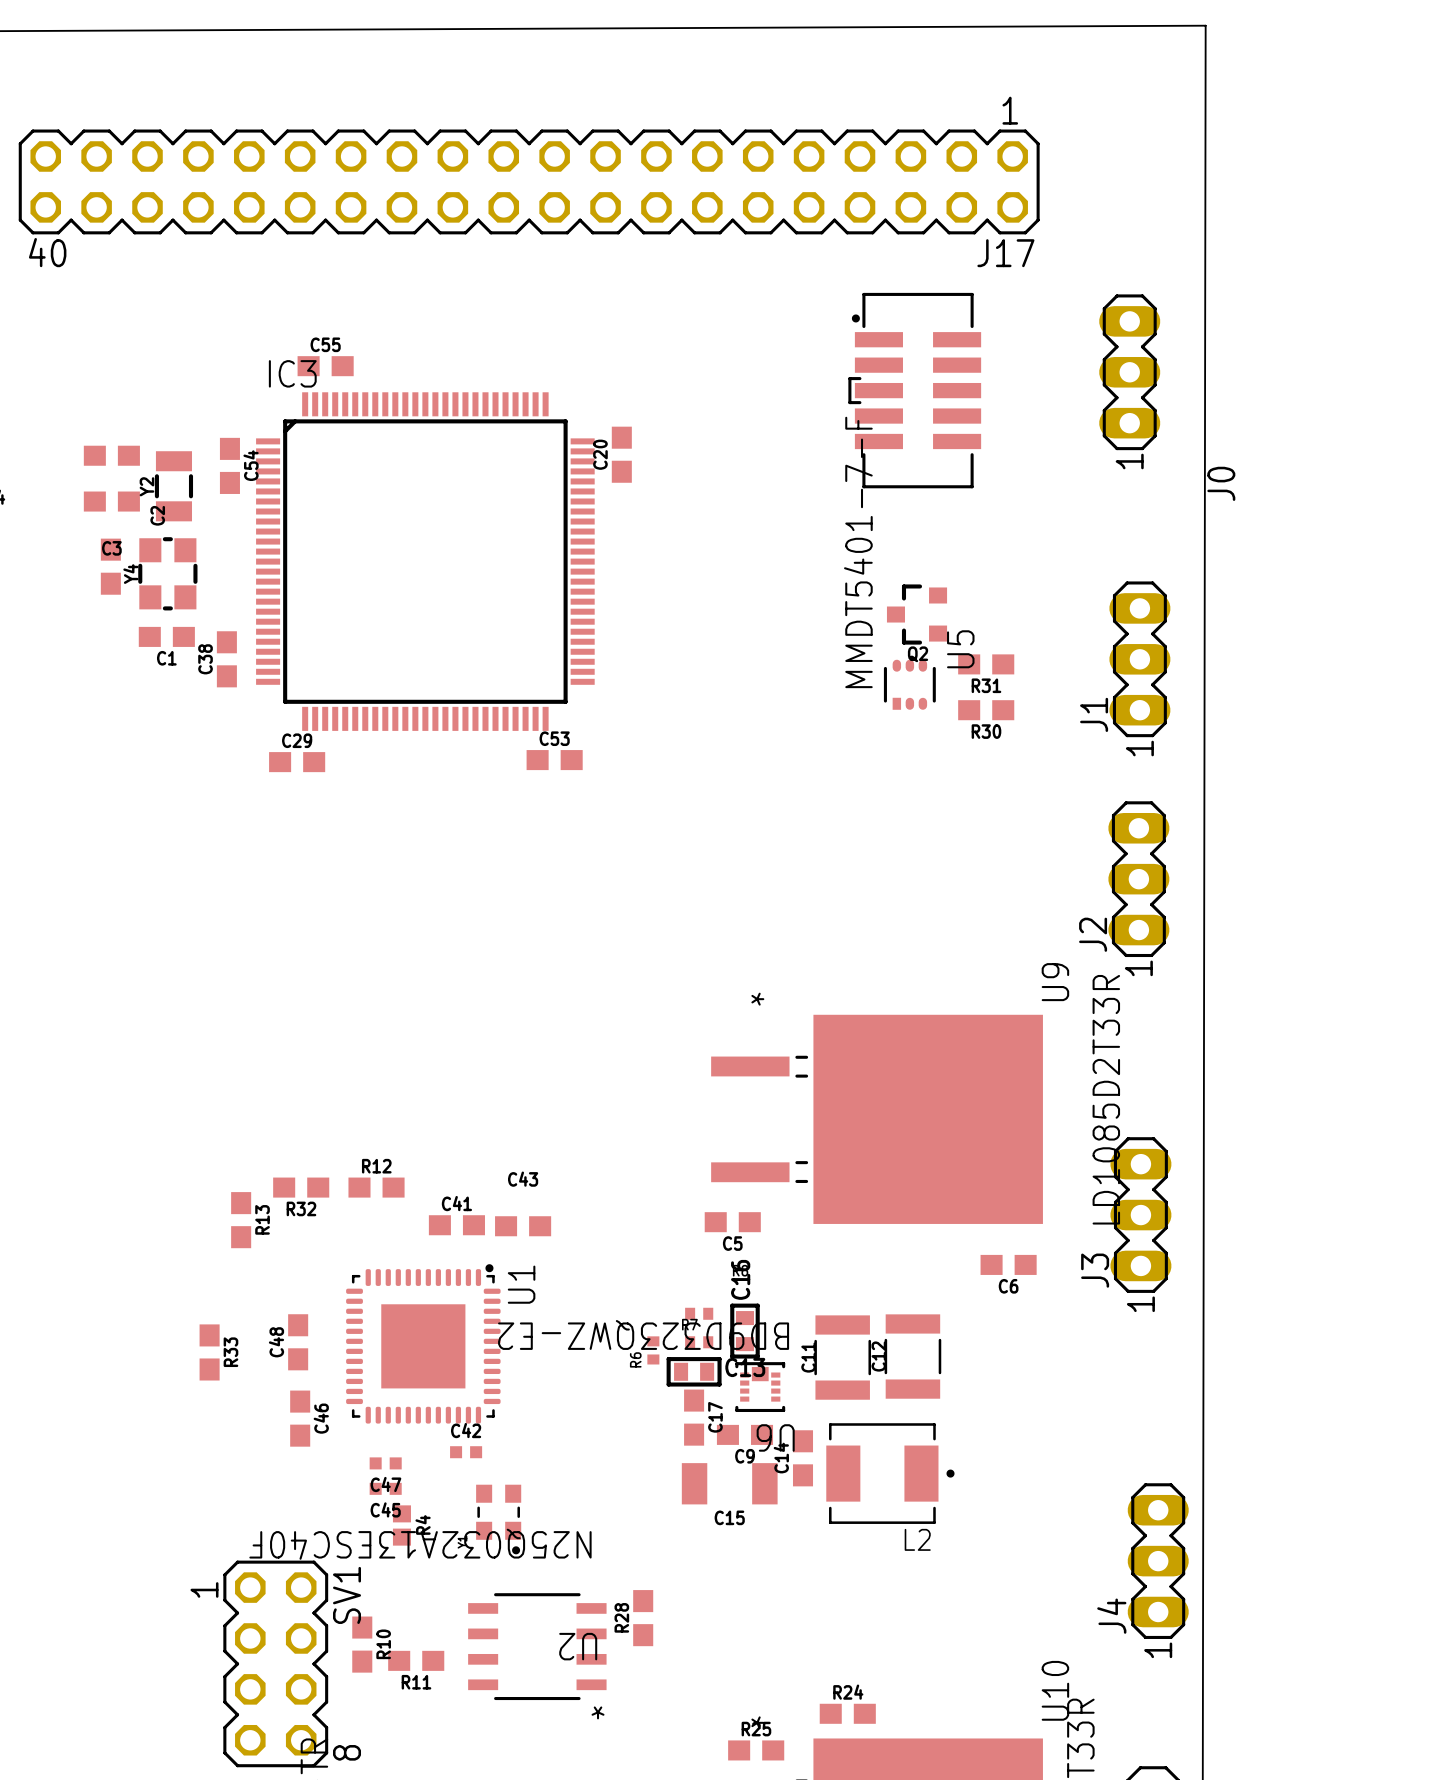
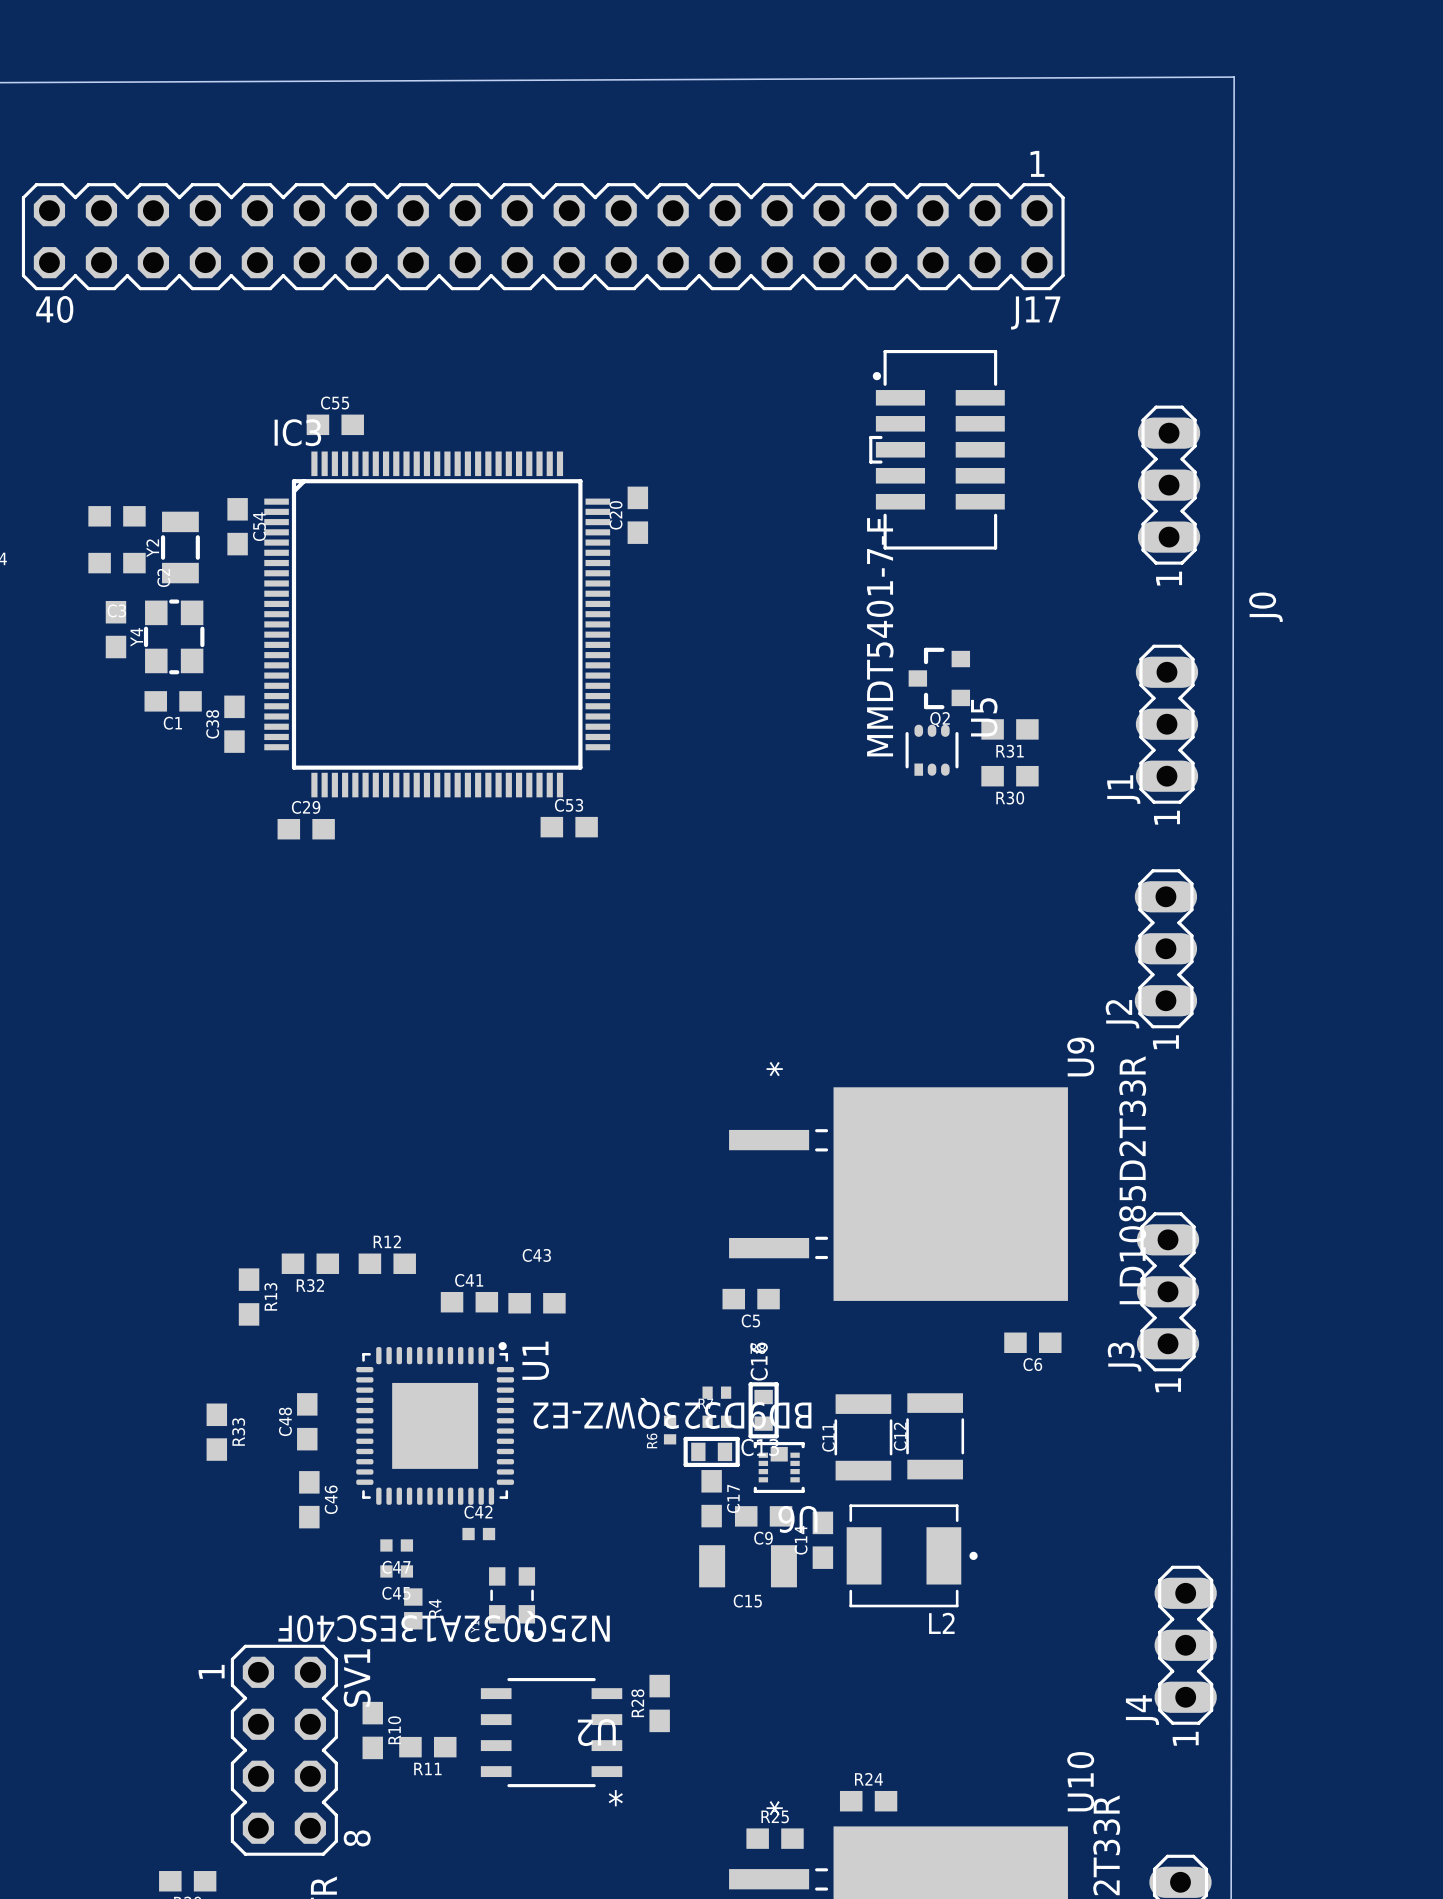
J0 position: (1129, 372) -> (1169, 485)

